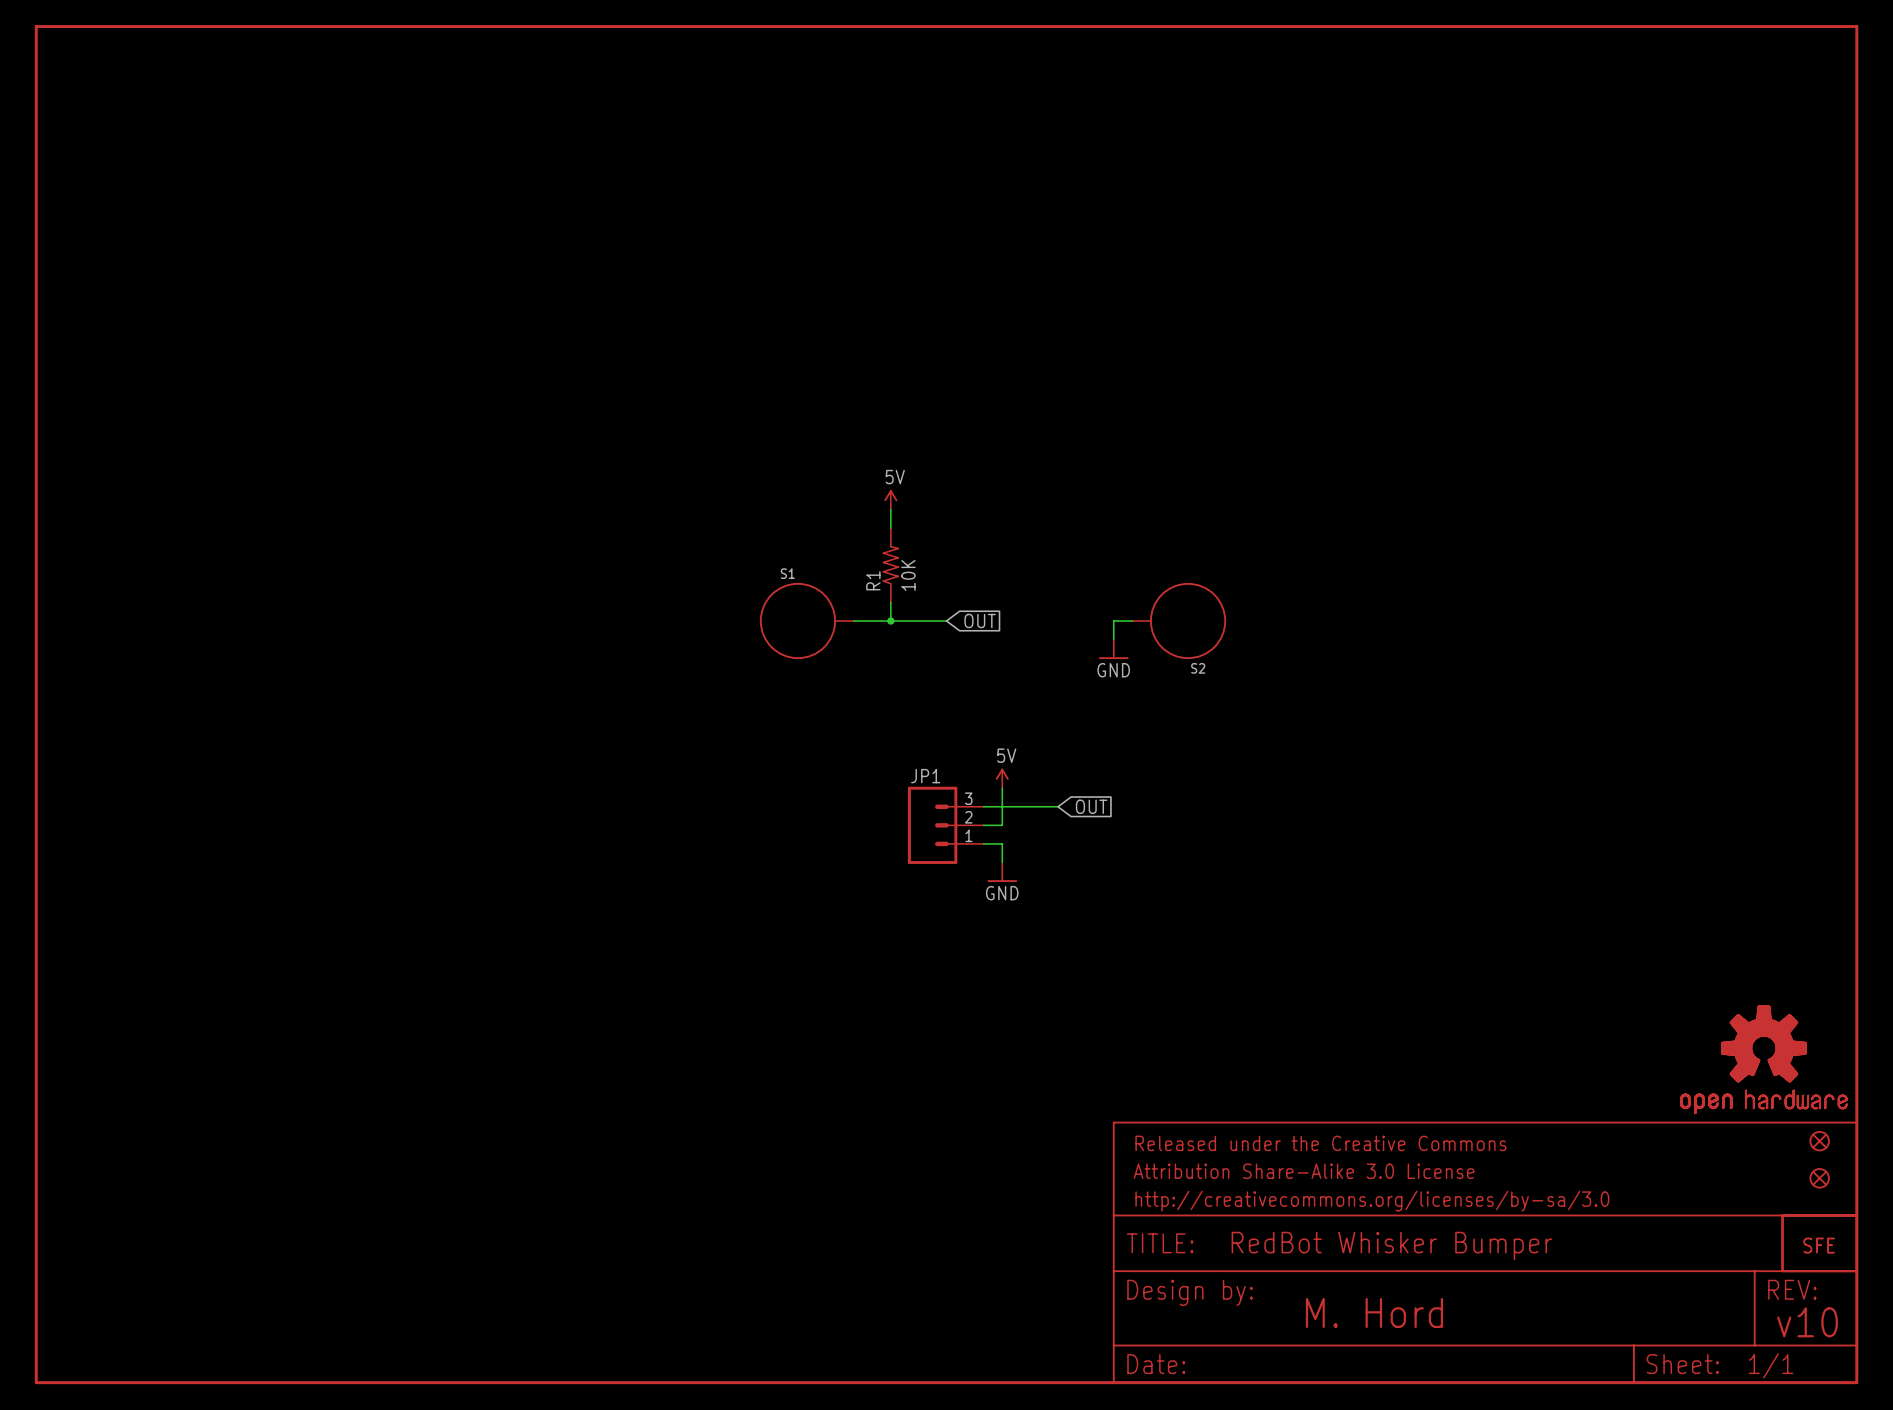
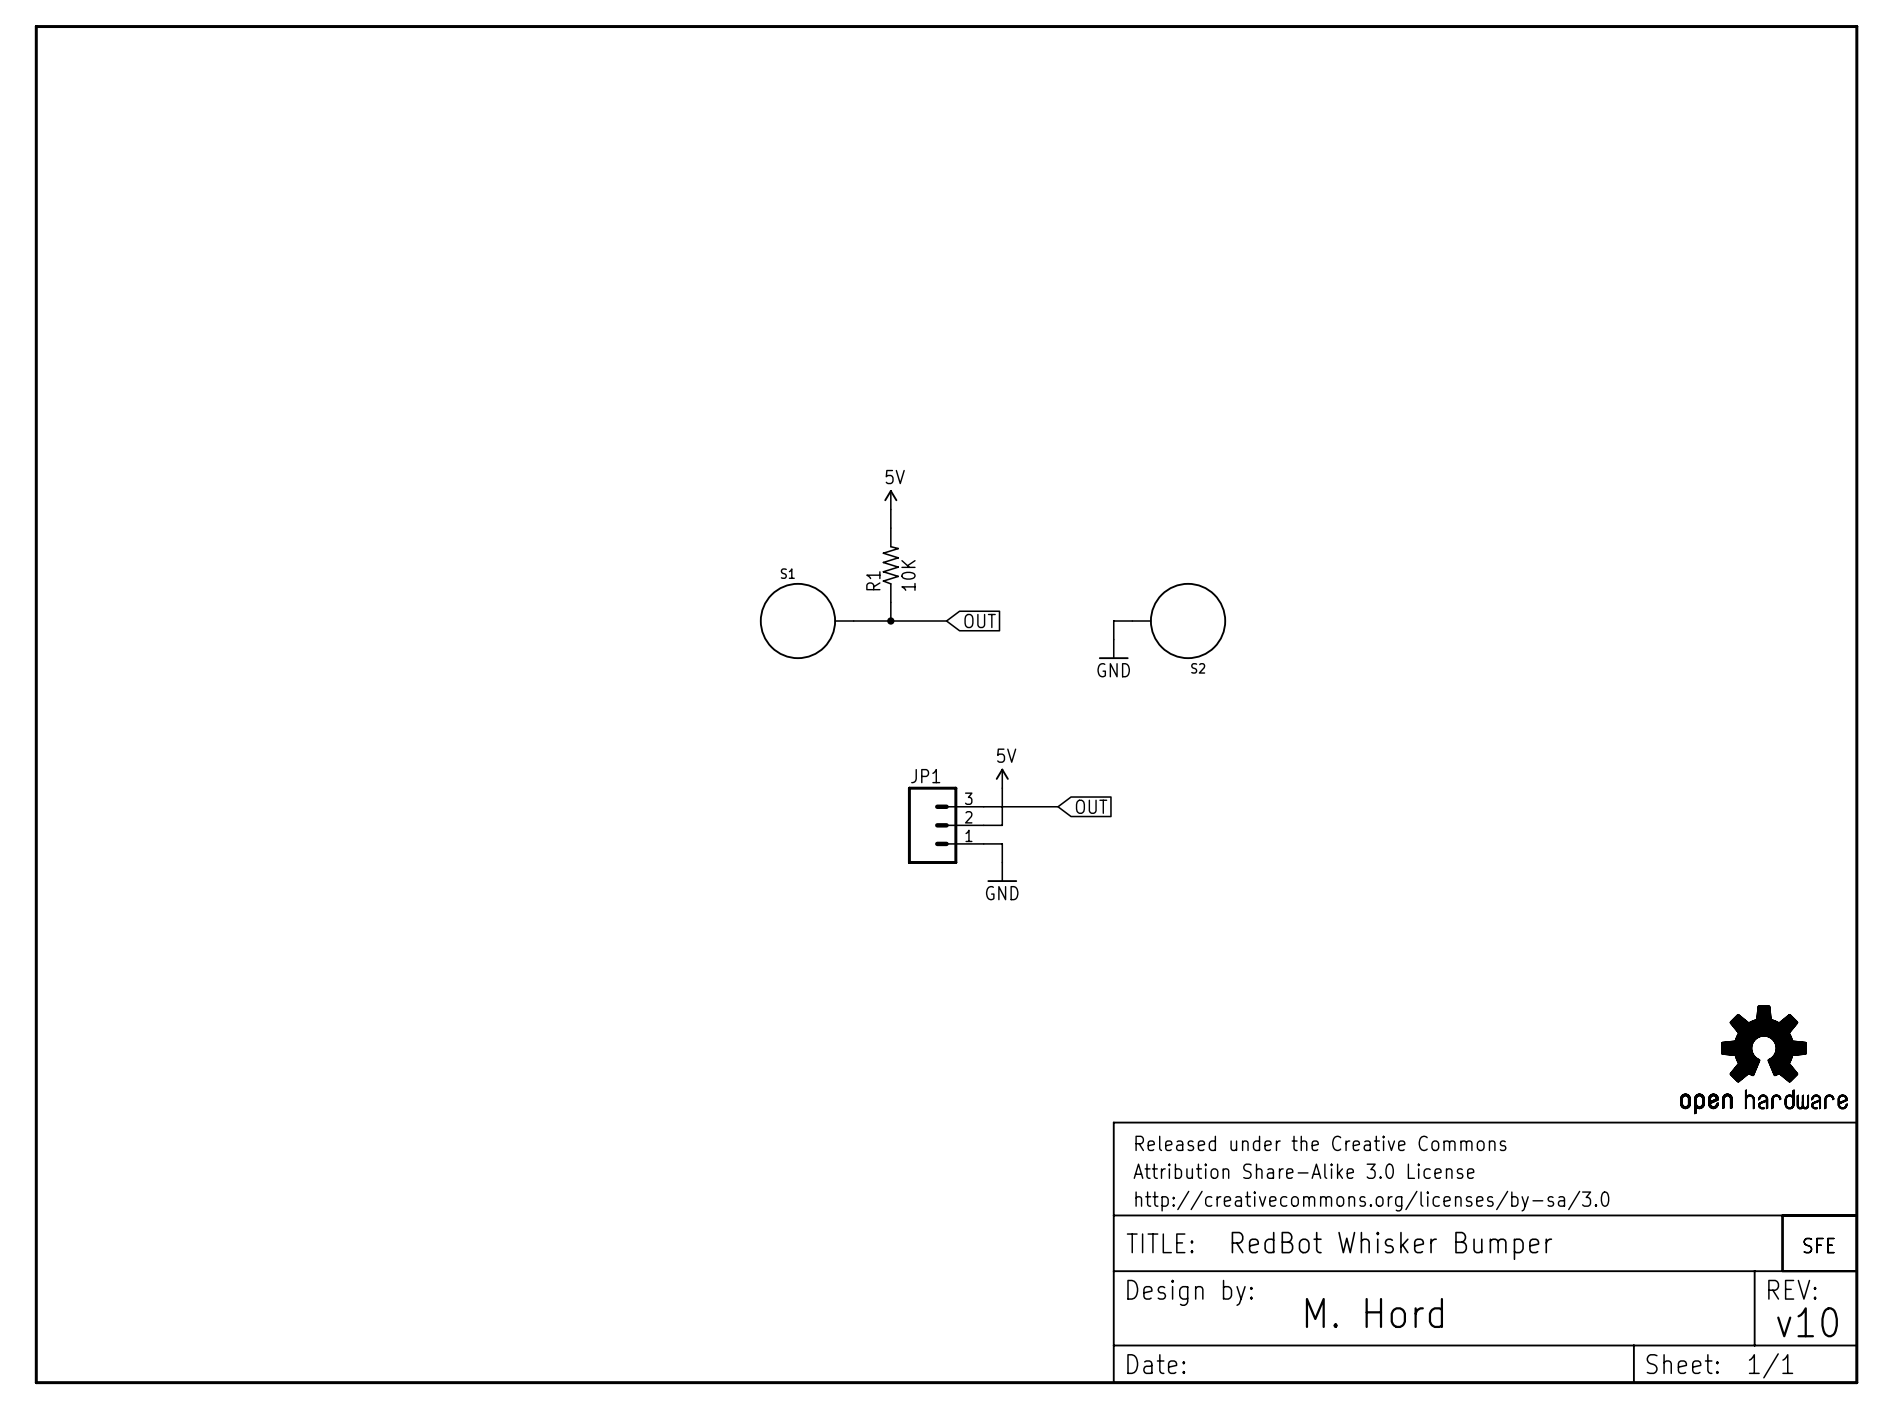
part: (1819, 1141) -> none
part: (1819, 1178) -> none

